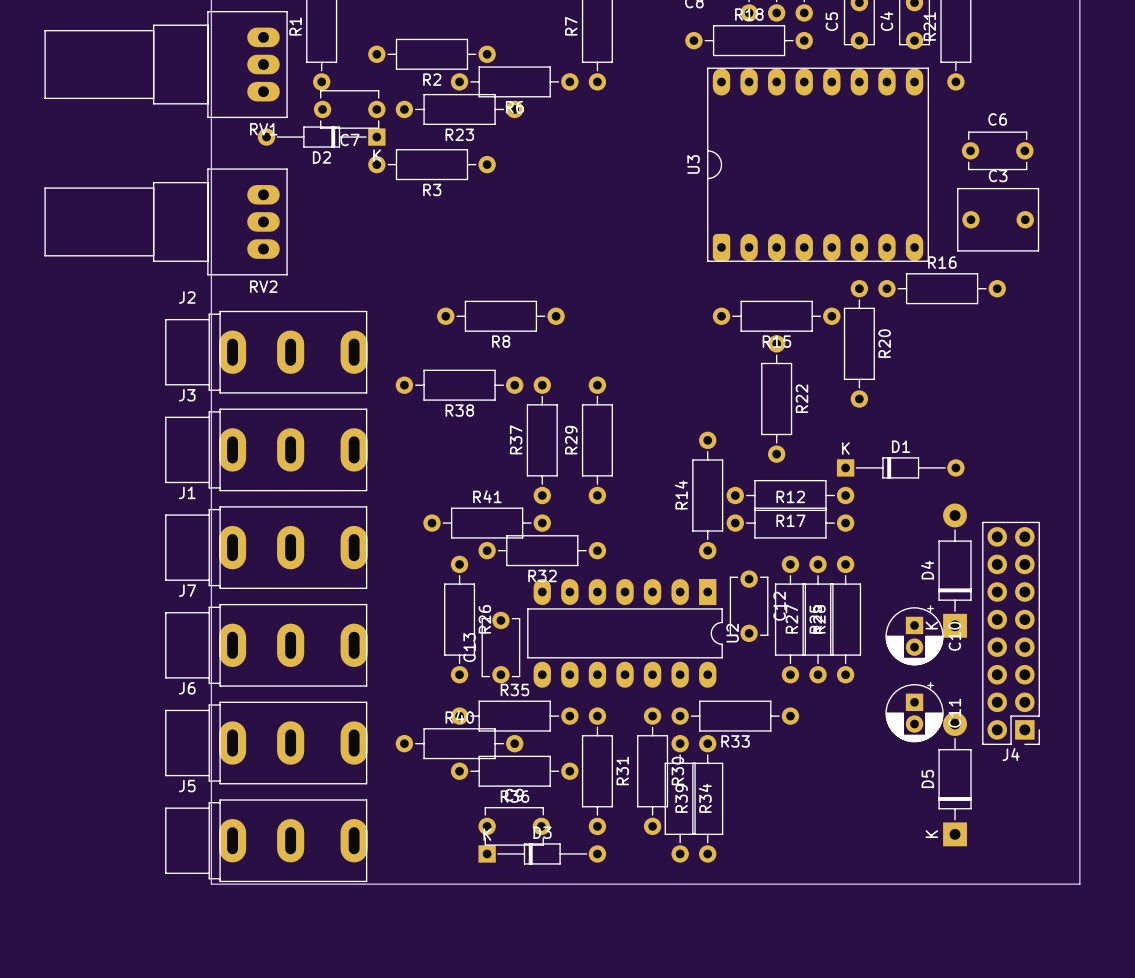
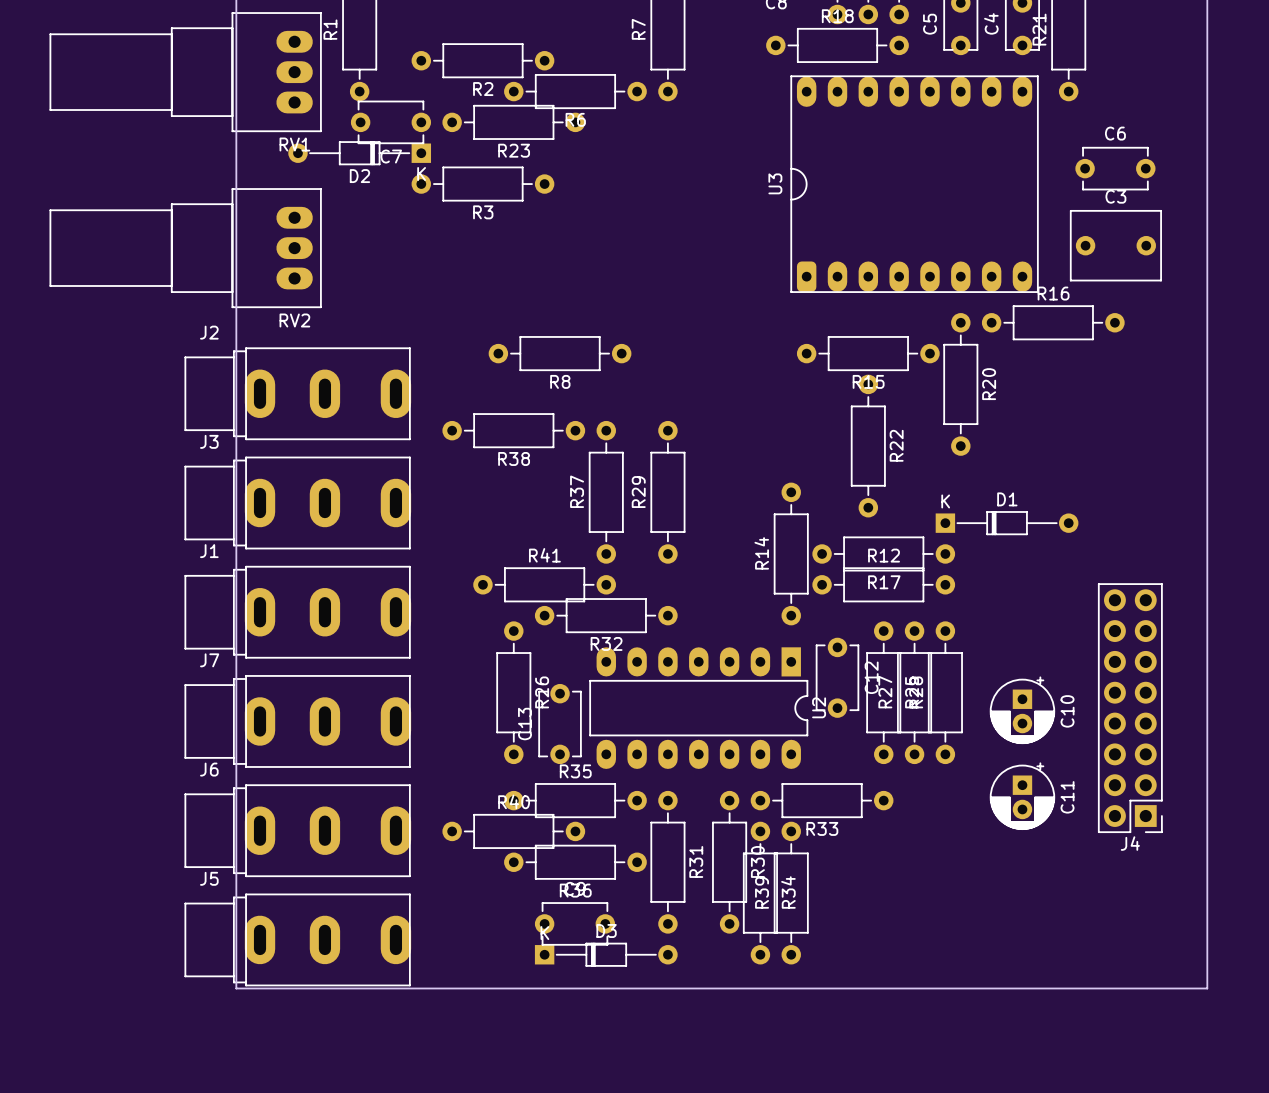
D4: (955, 570) -> none
D5: (955, 779) -> none

